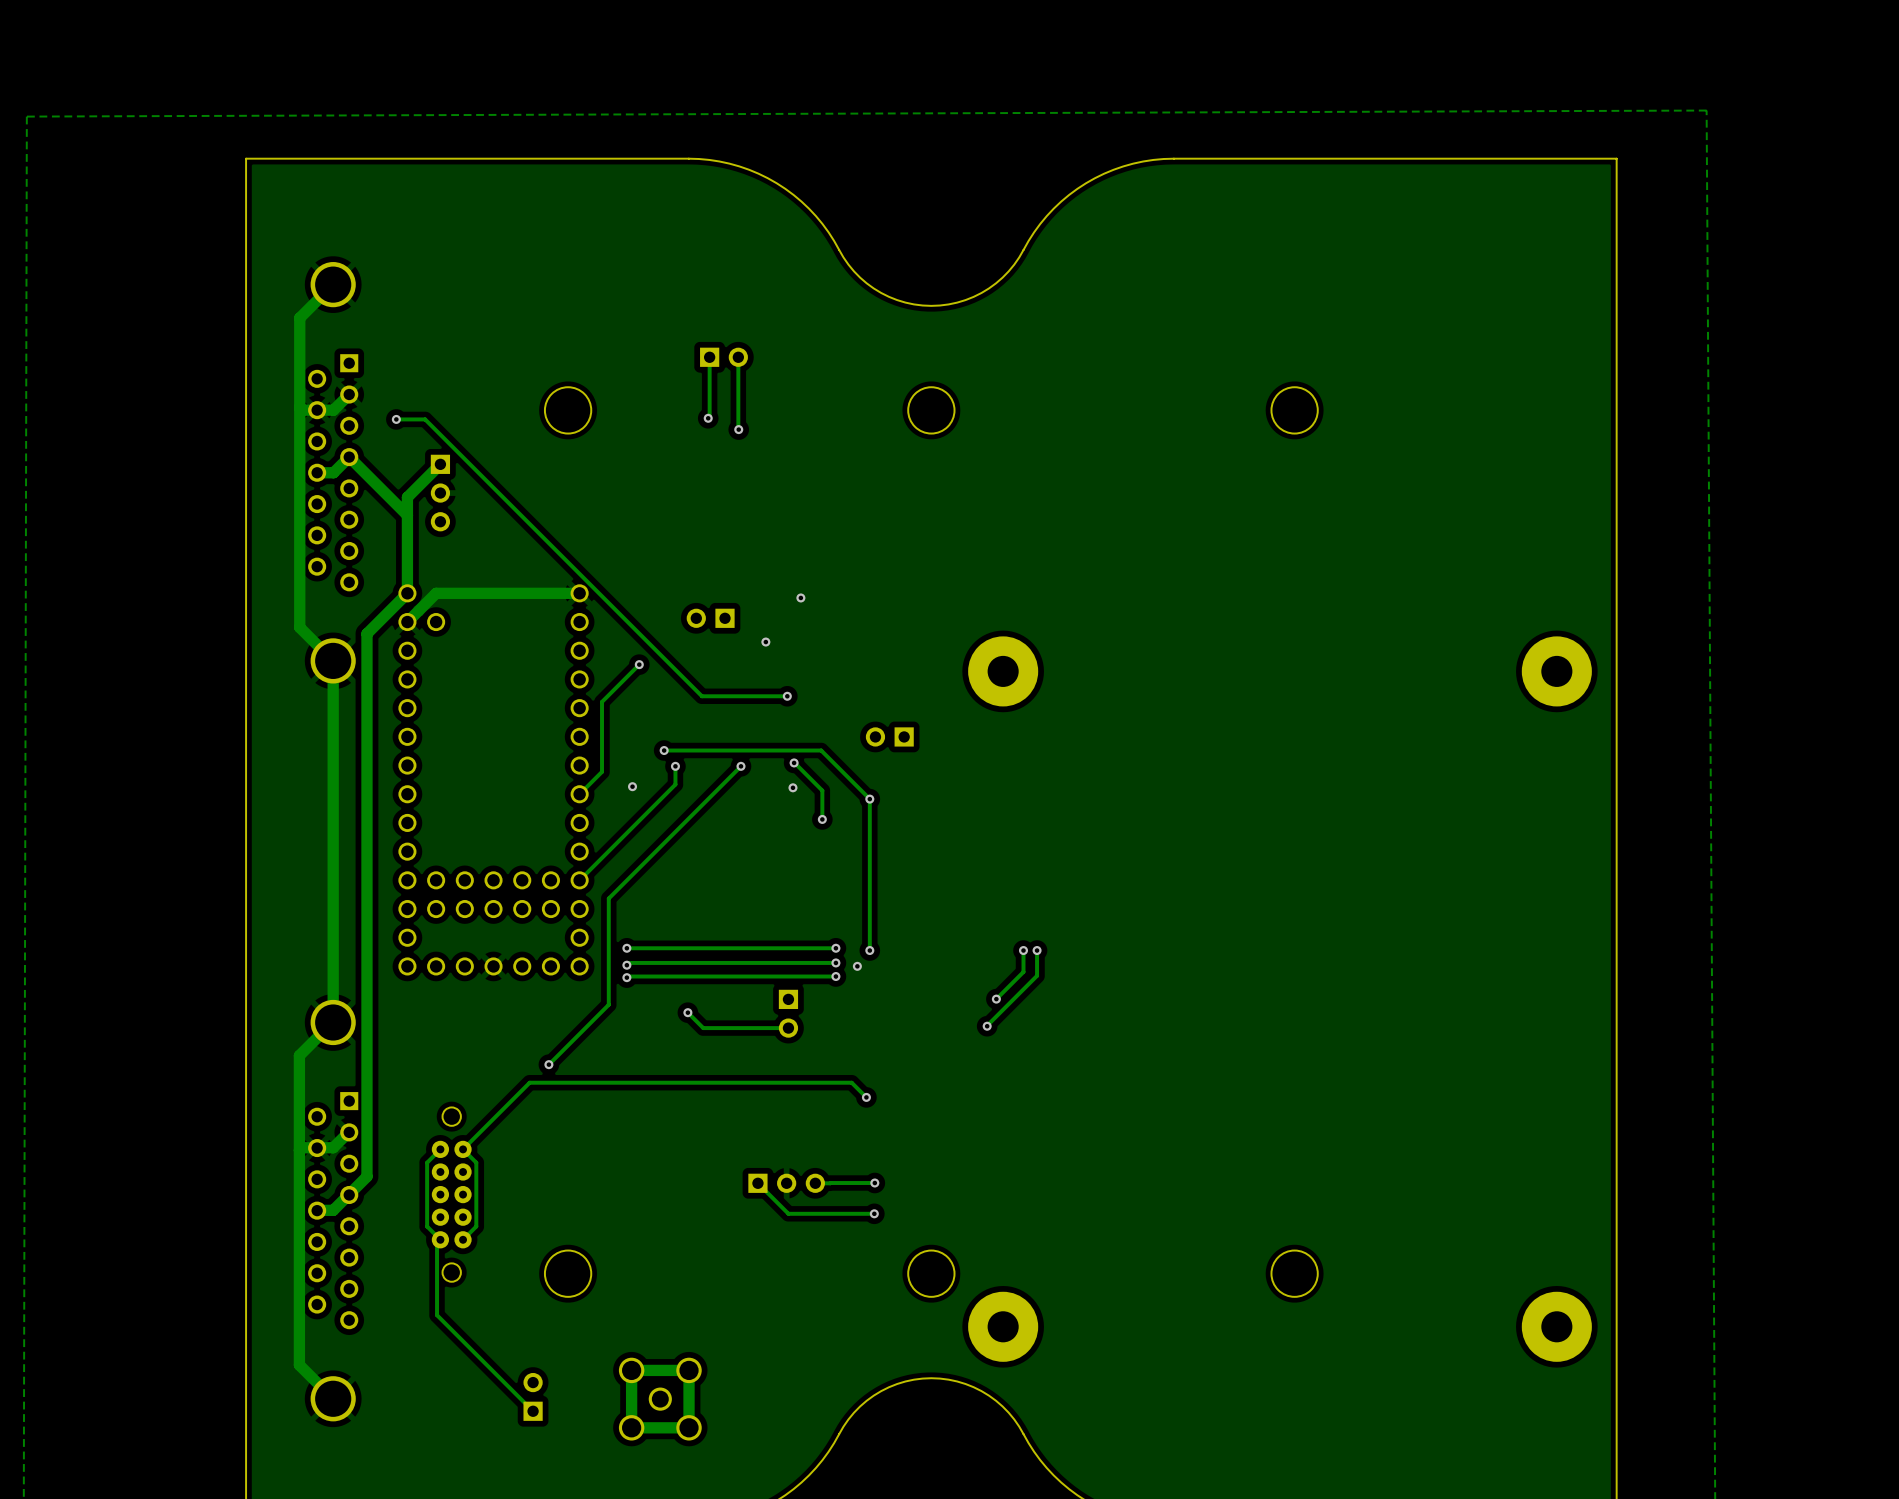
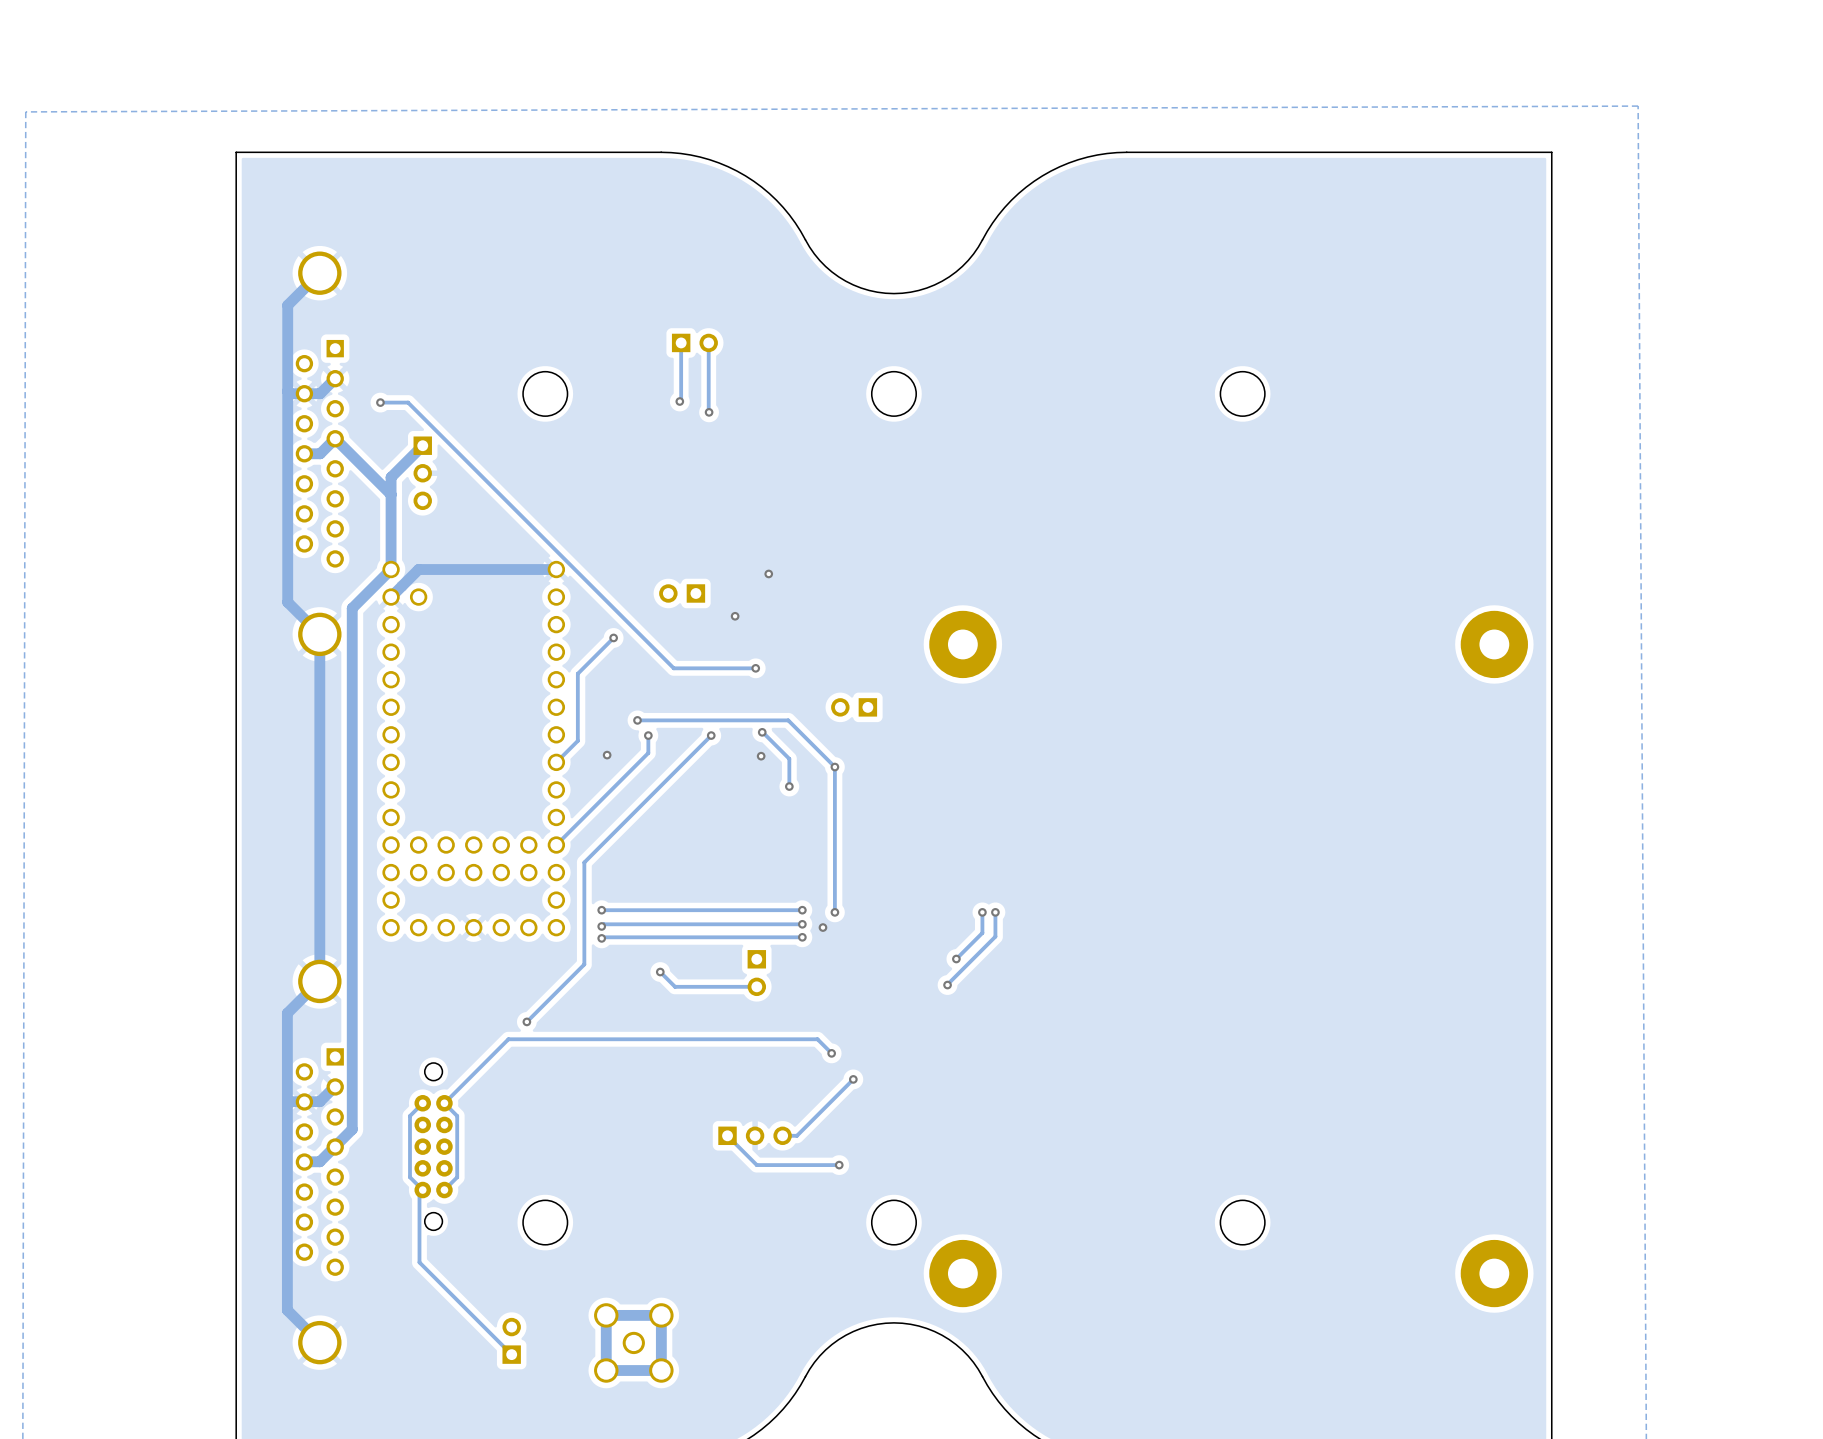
track: (874, 1183) (830, 1183) -> (853, 1079) (797, 1135)
via position: (874, 1183) -> (853, 1079)

